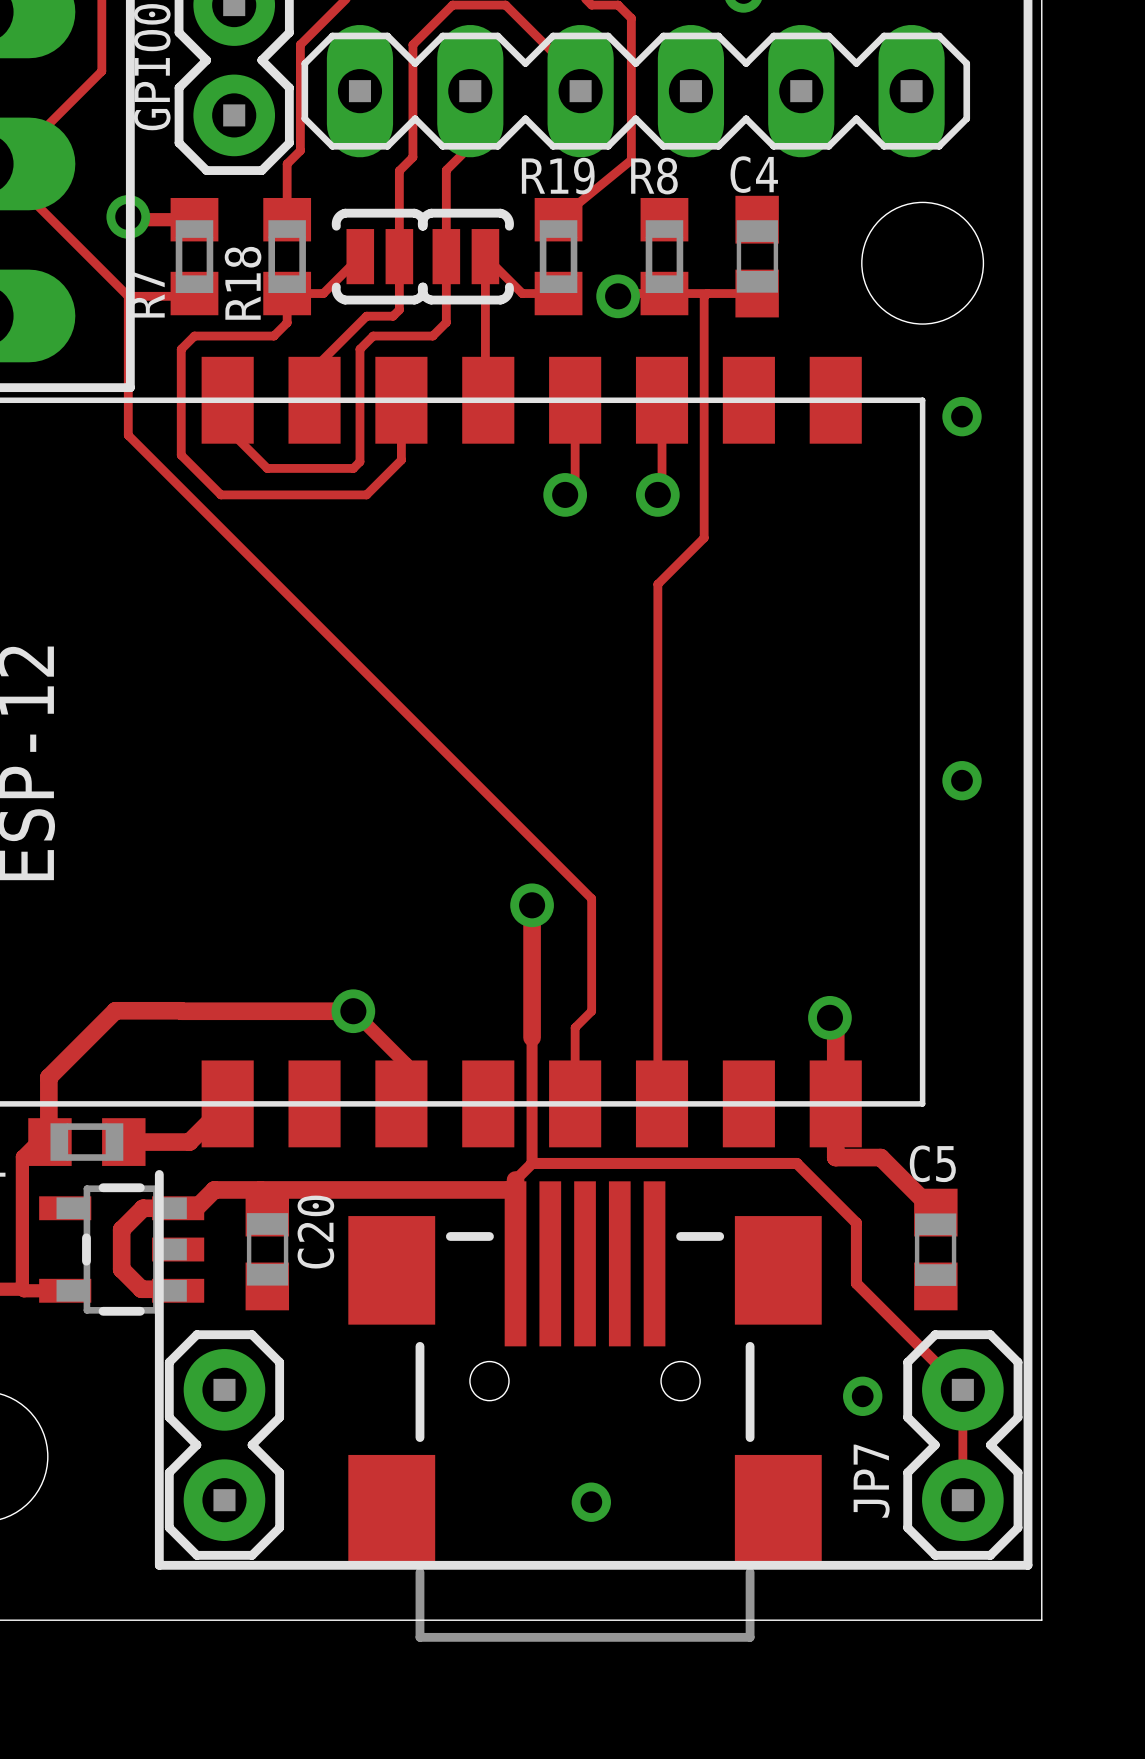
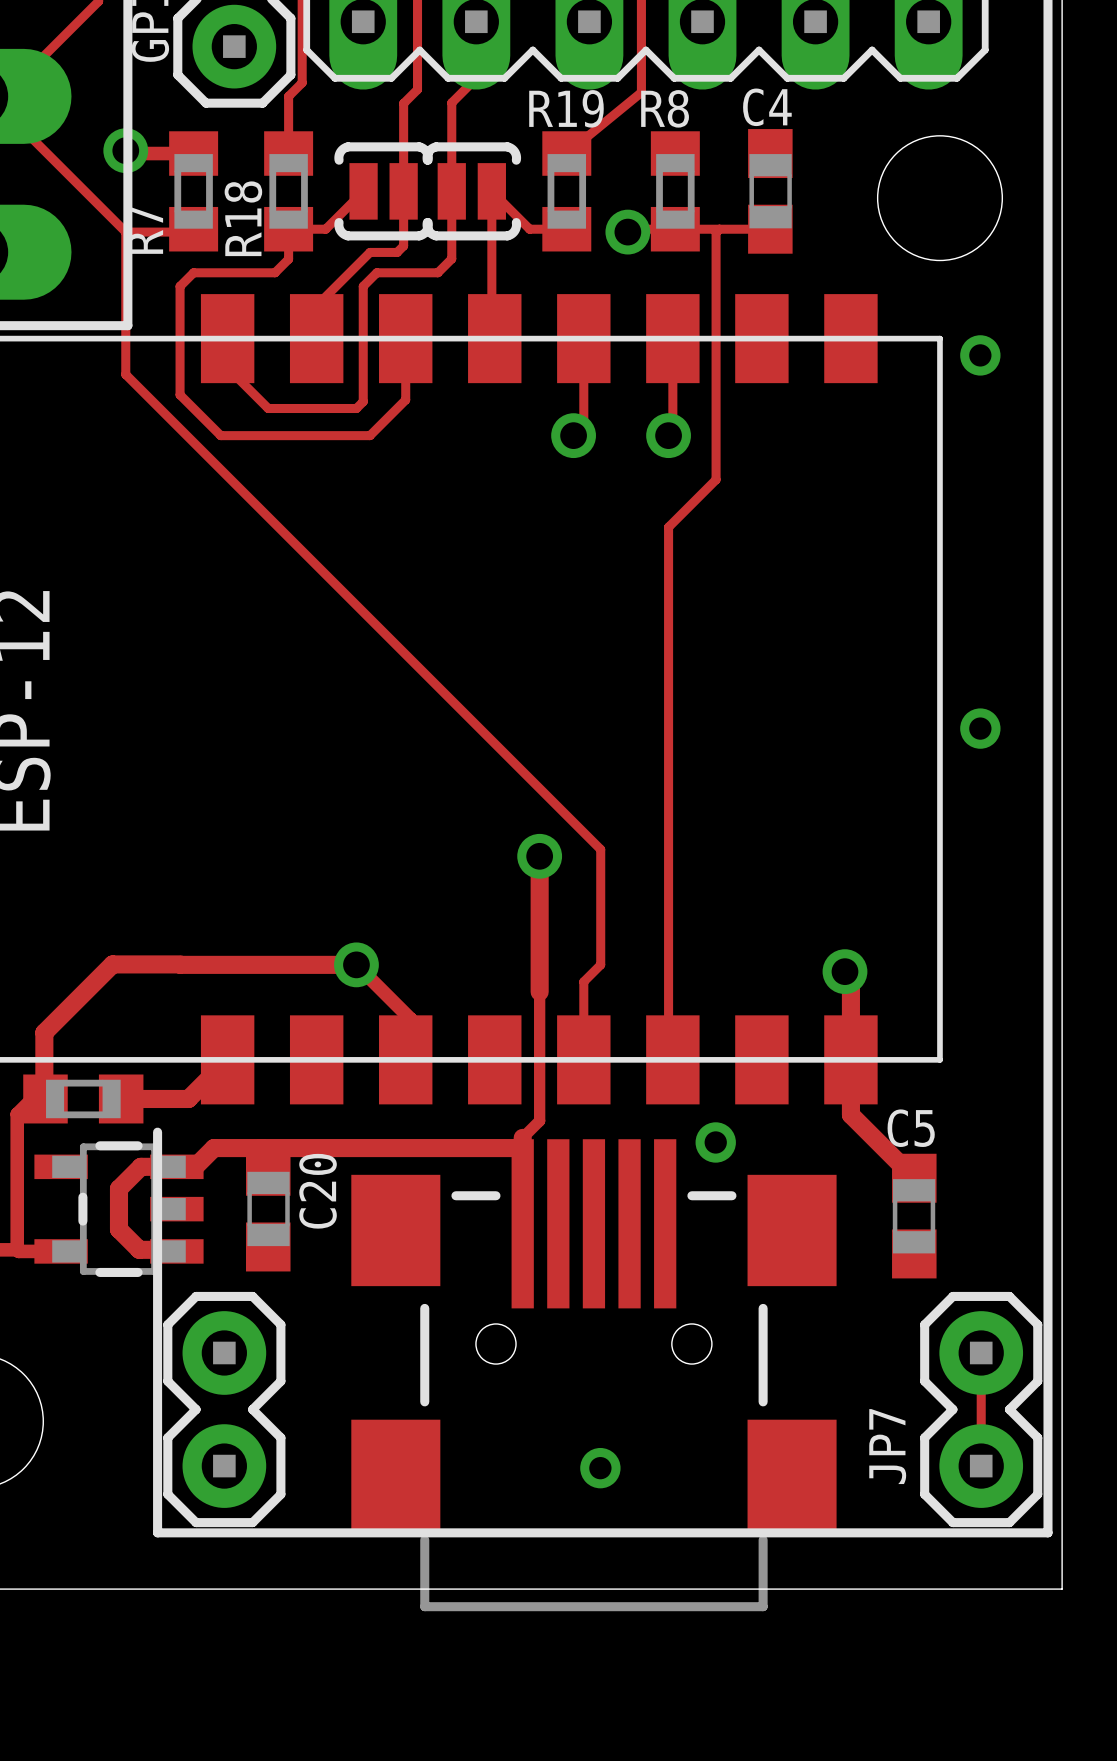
track: (835, 1157) (880, 1157) (935, 1212) -> (850, 1114) (914, 1178)
track: (532, 1163) (796, 1163) (856, 1223) (856, 1283) (962, 1389) (962, 1369) -> none
via: none -> (715, 1142)
C5 position: (935, 1249) -> (914, 1216)
via: (862, 1396) -> none

